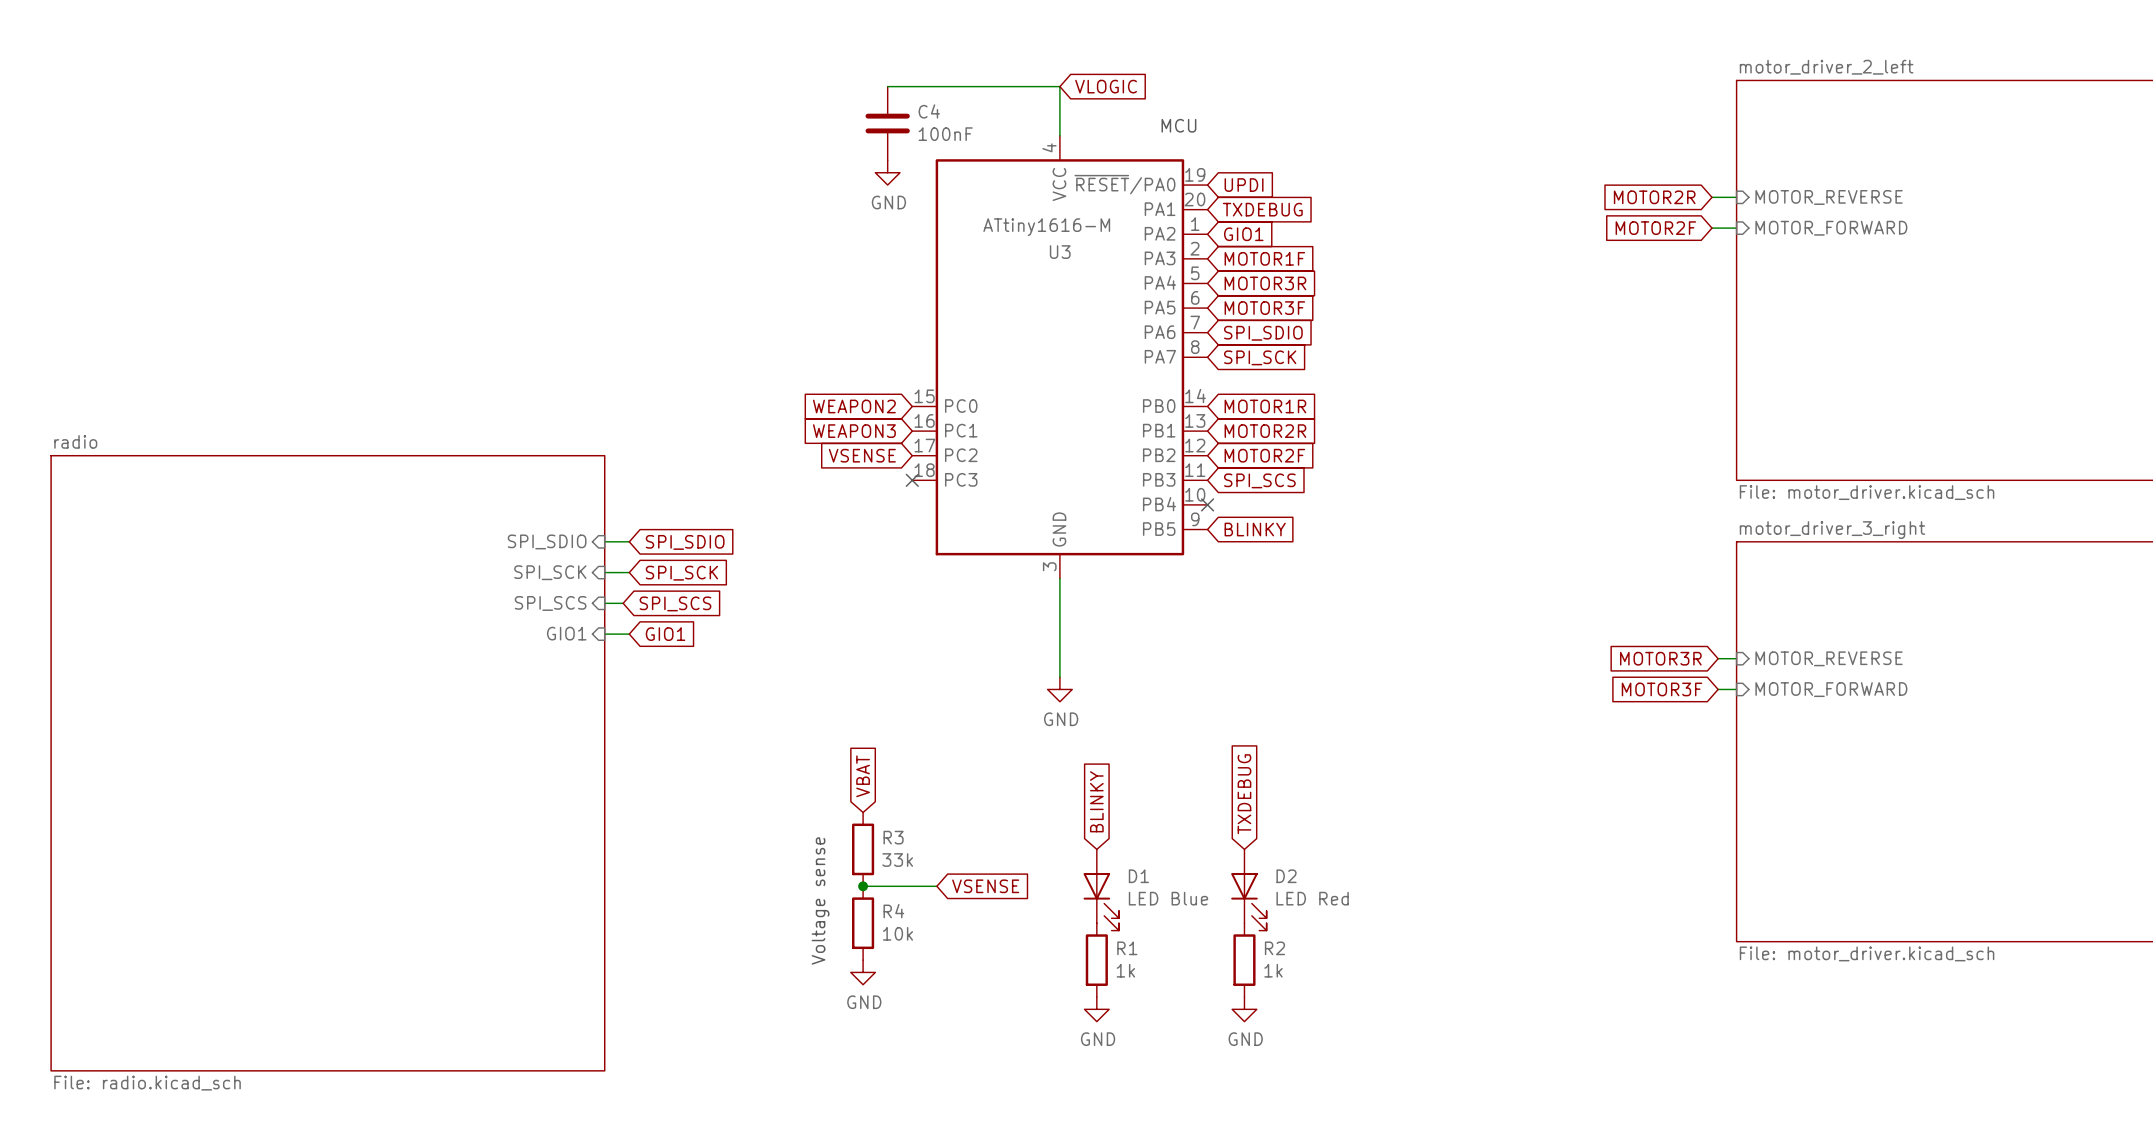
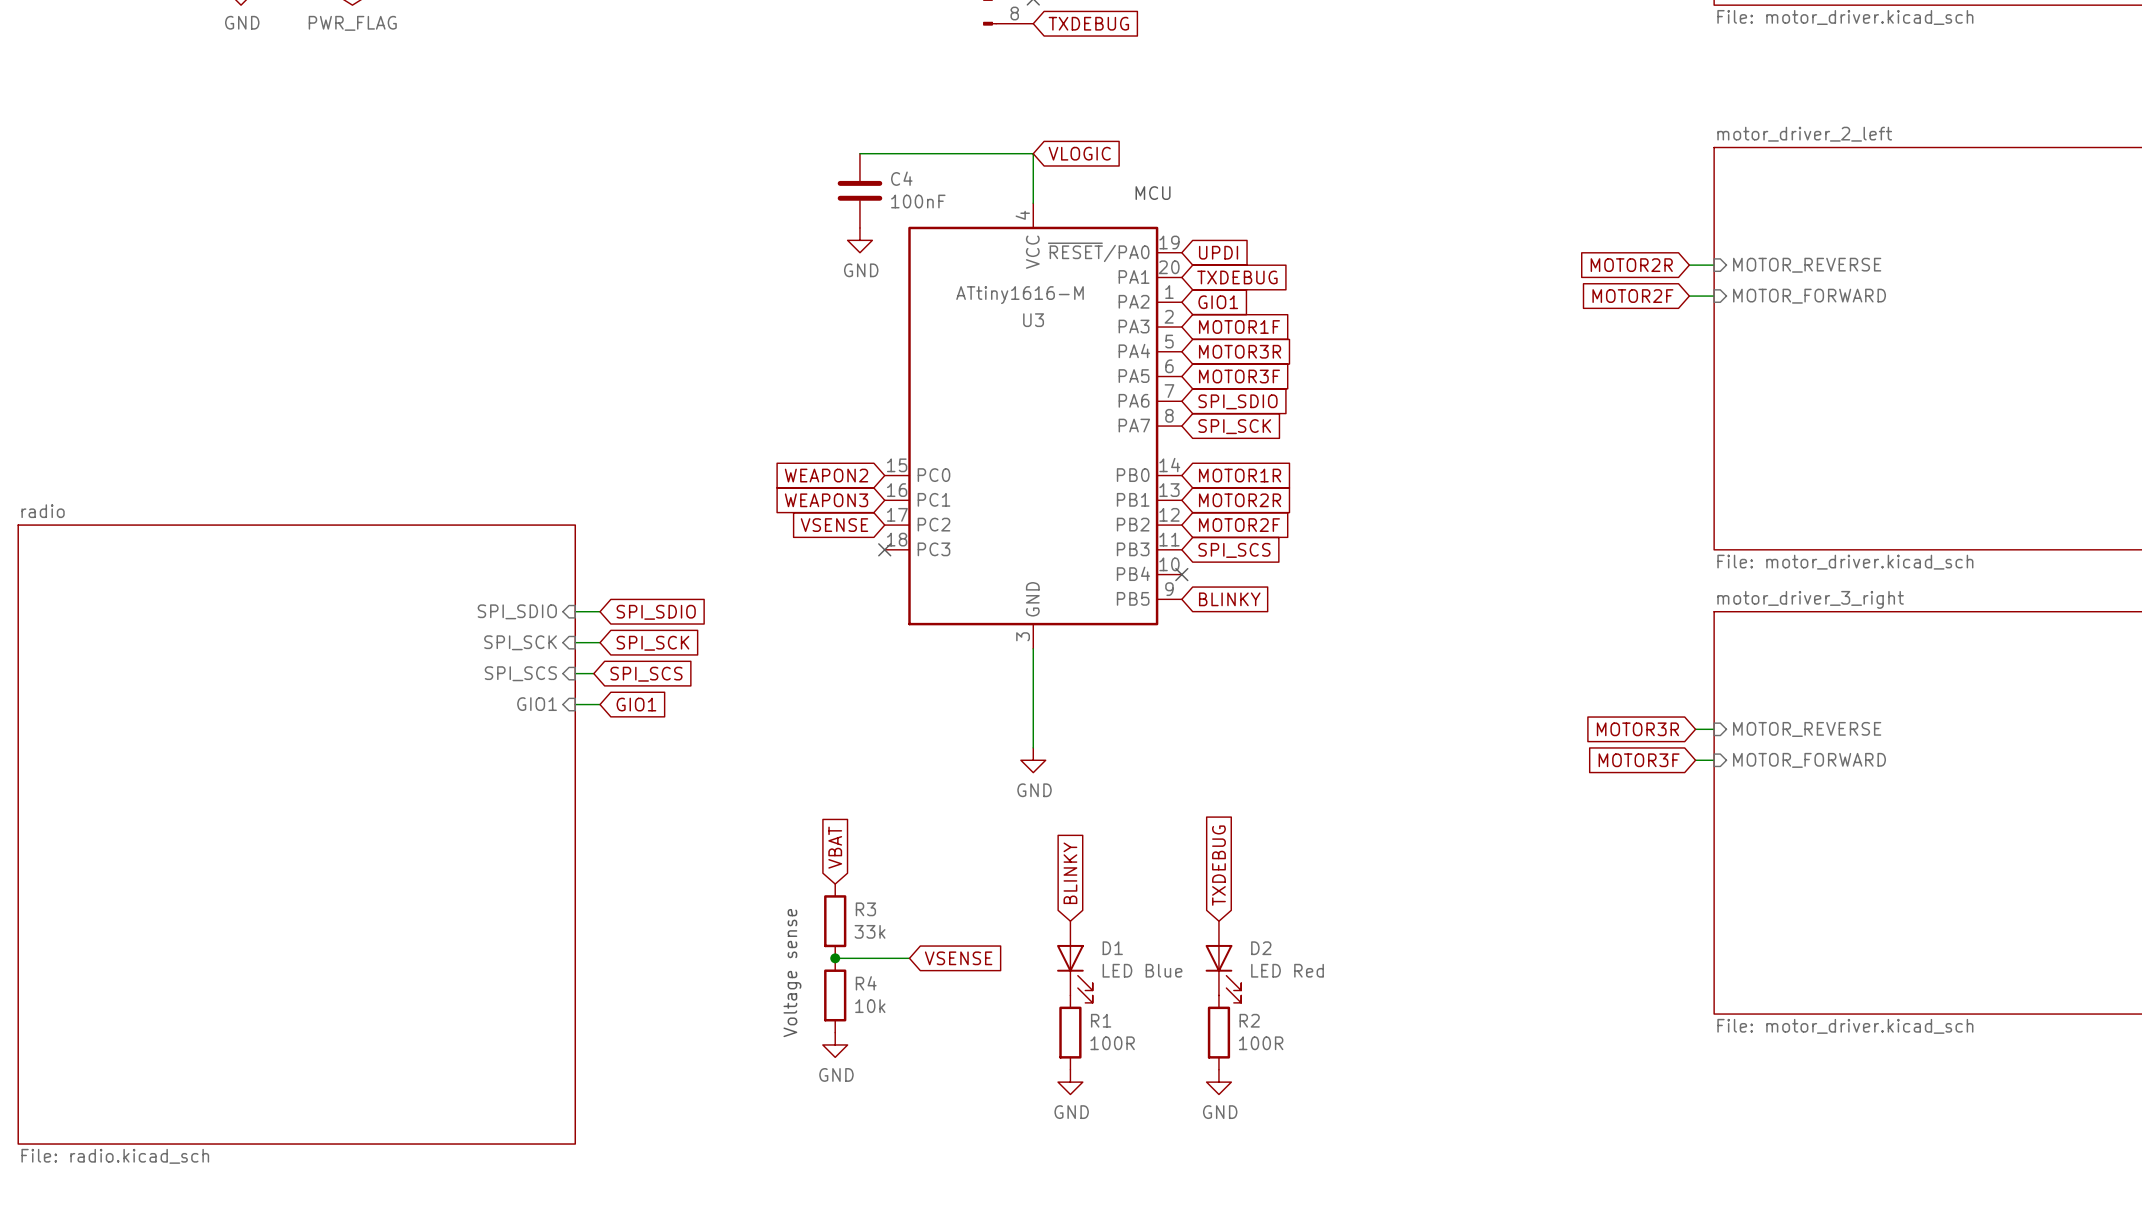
R1 value: 1k (1125, 970) -> 100R (1112, 1043)
R2 value: 1k (1273, 970) -> 100R (1261, 1043)

